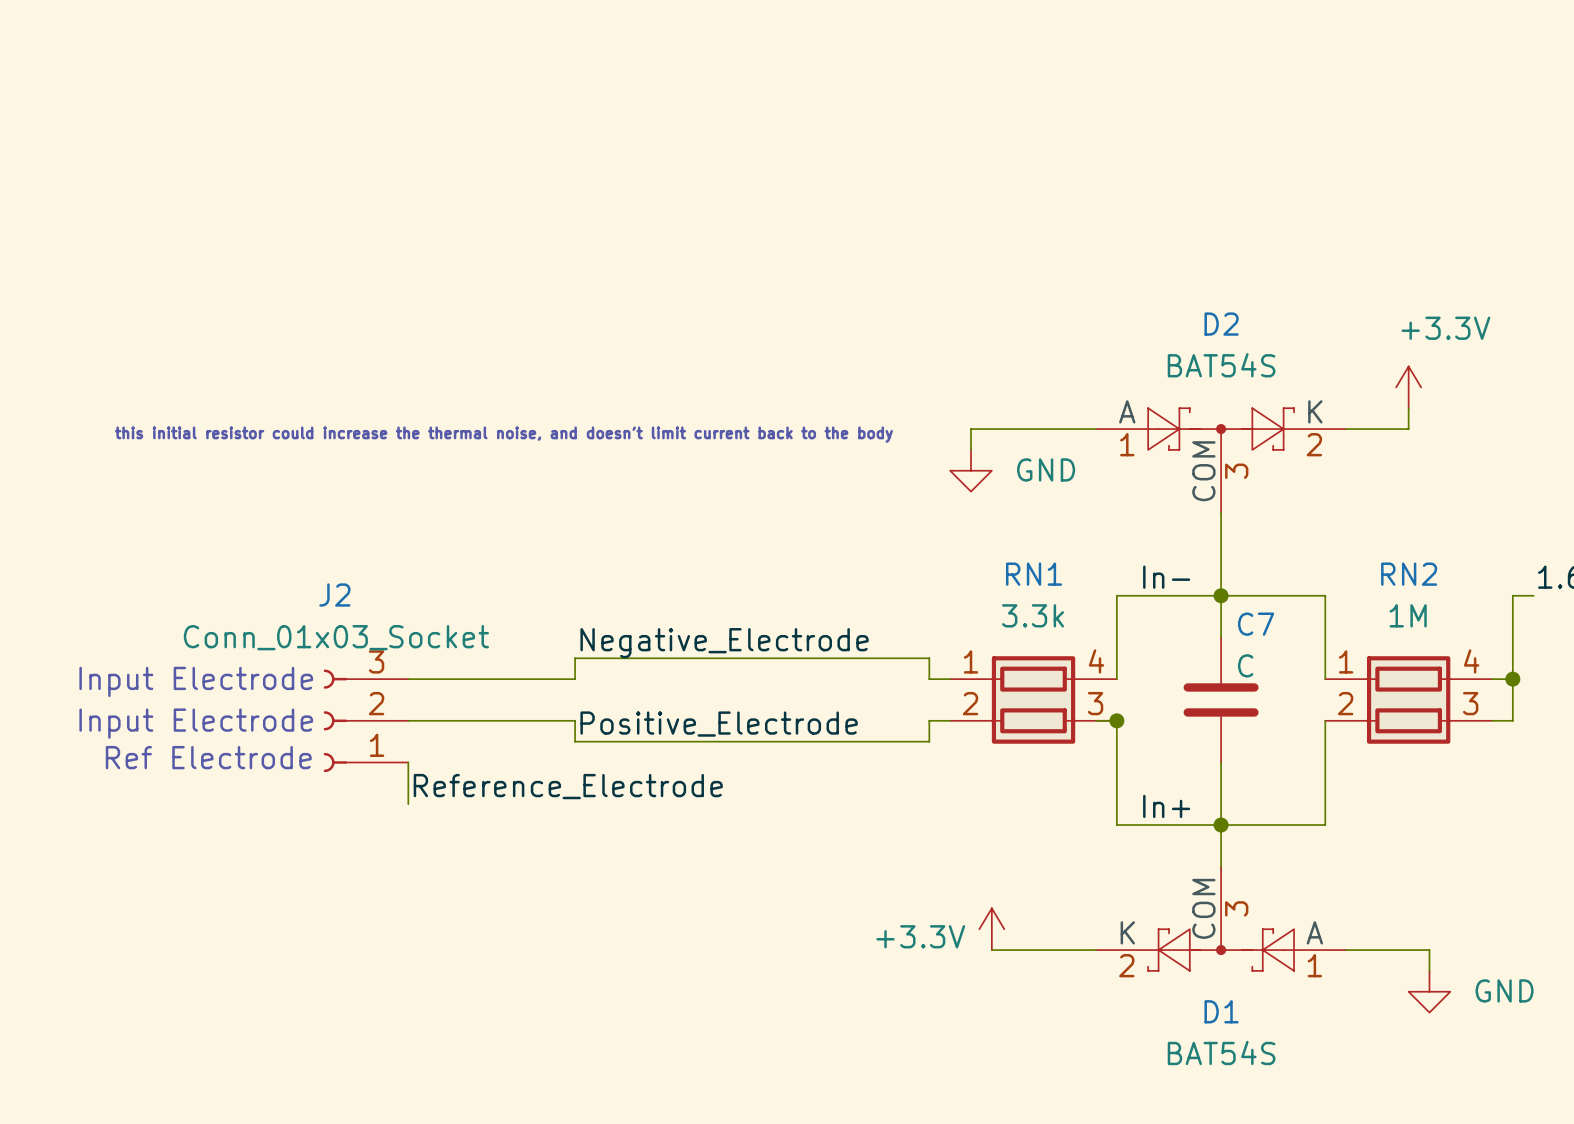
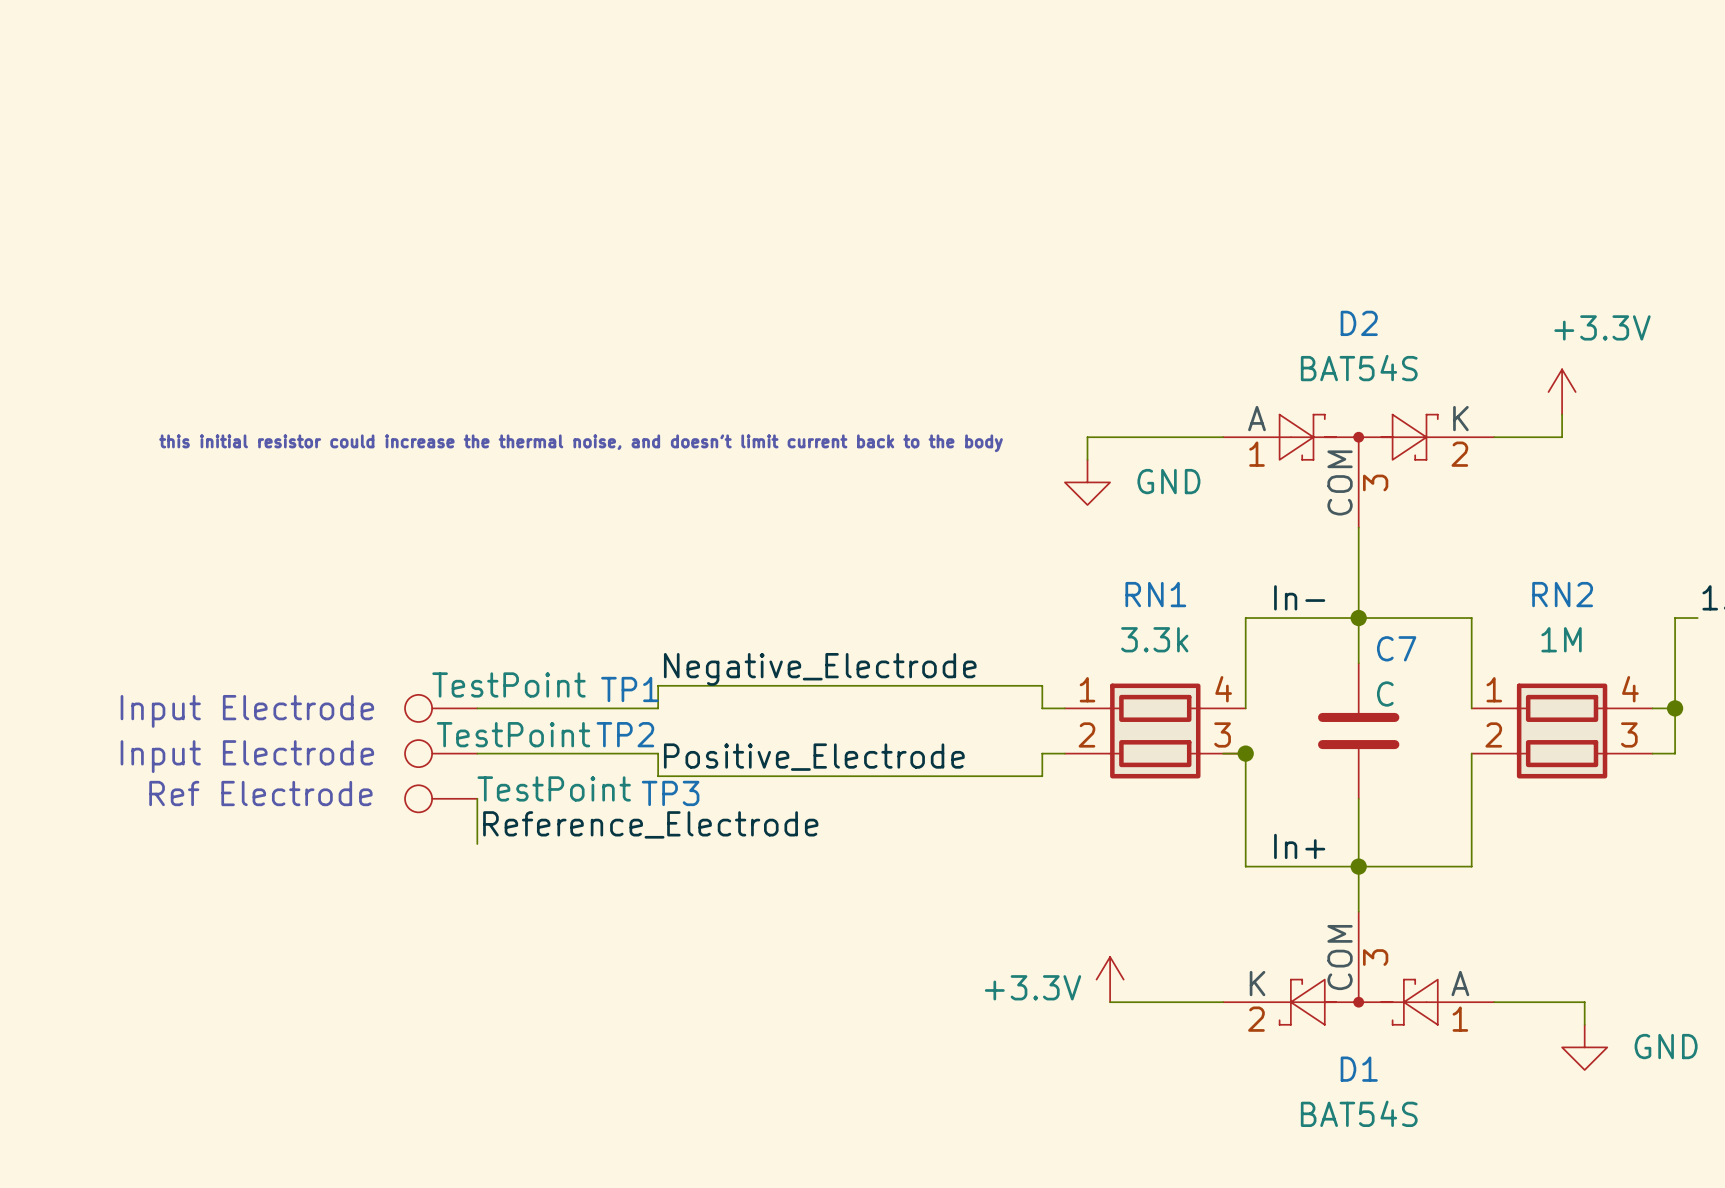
TP1: none -> TestPoint (441, 708)
J2: Conn_01x03_Socket (366, 720) -> none
TP2: none -> TestPoint (441, 753)
TP3: none -> TestPoint (441, 798)

